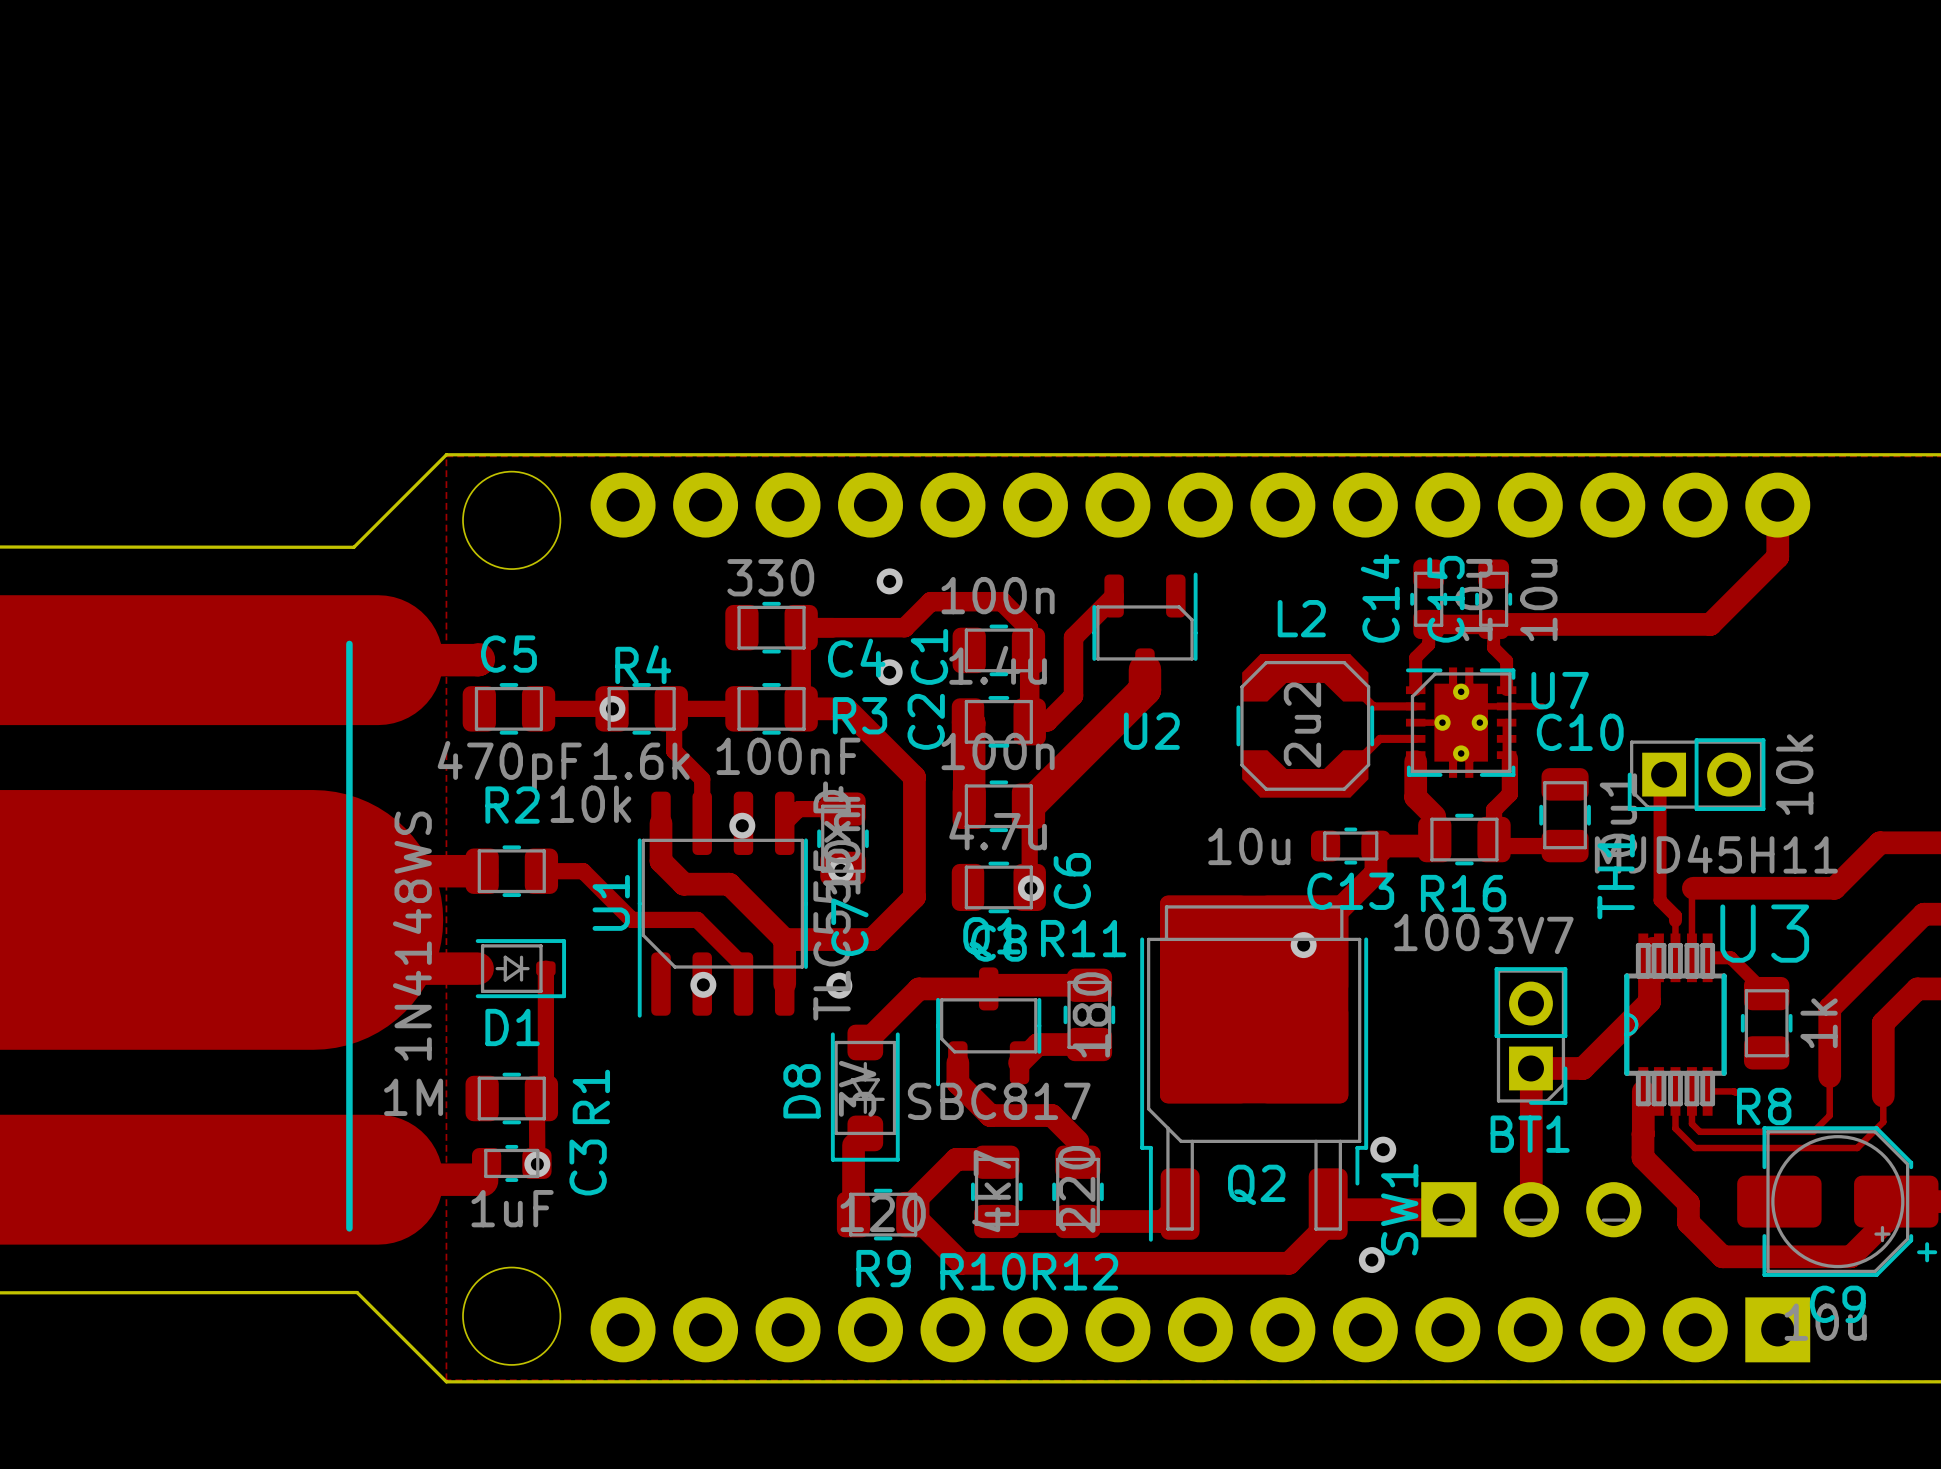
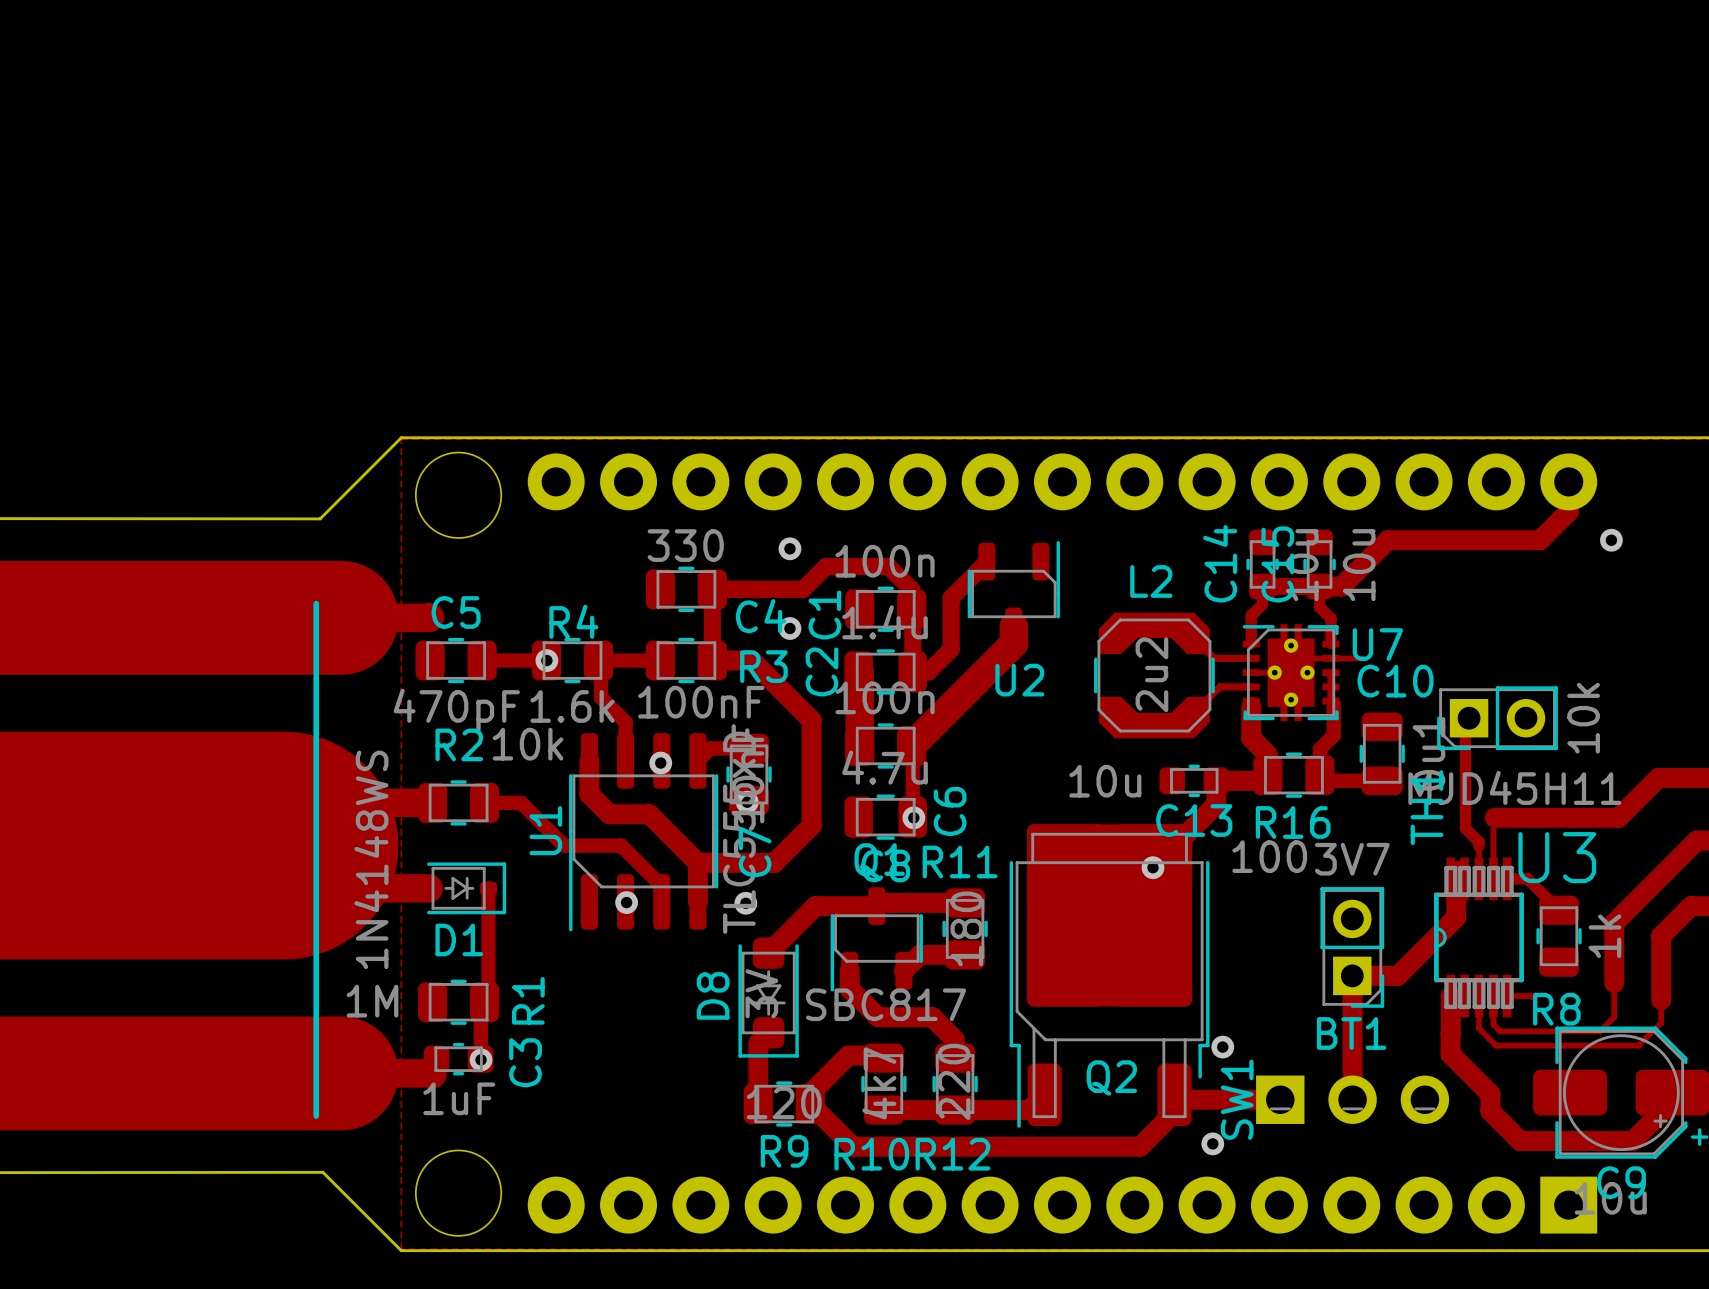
track: (1777, 539) (1777, 557) (1710, 624) (1518, 624) -> (1568, 511) (1540, 540) (1387, 540) (1341, 586)
via: none -> (1611, 540)

